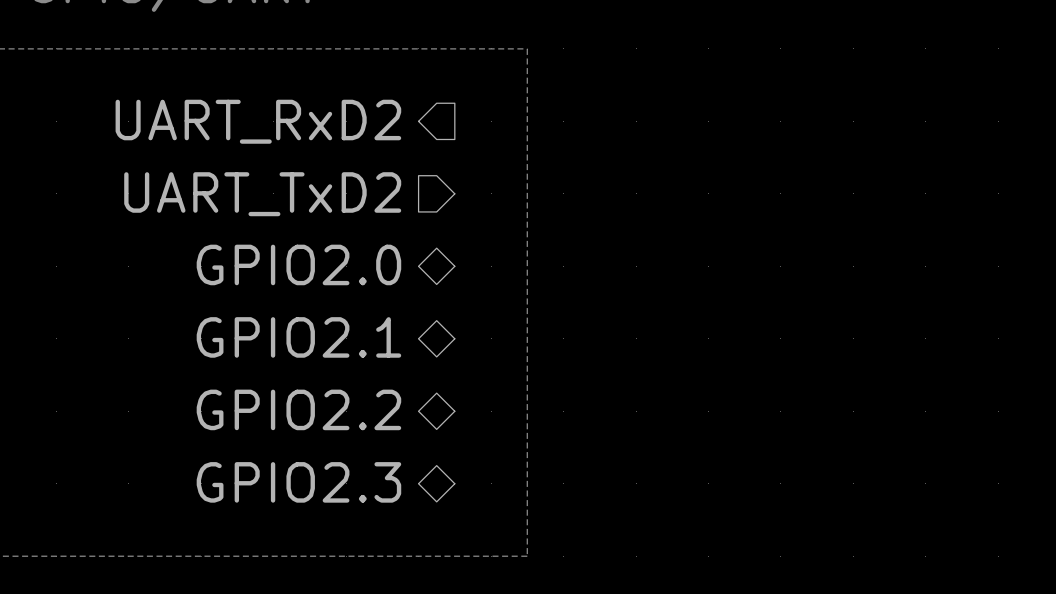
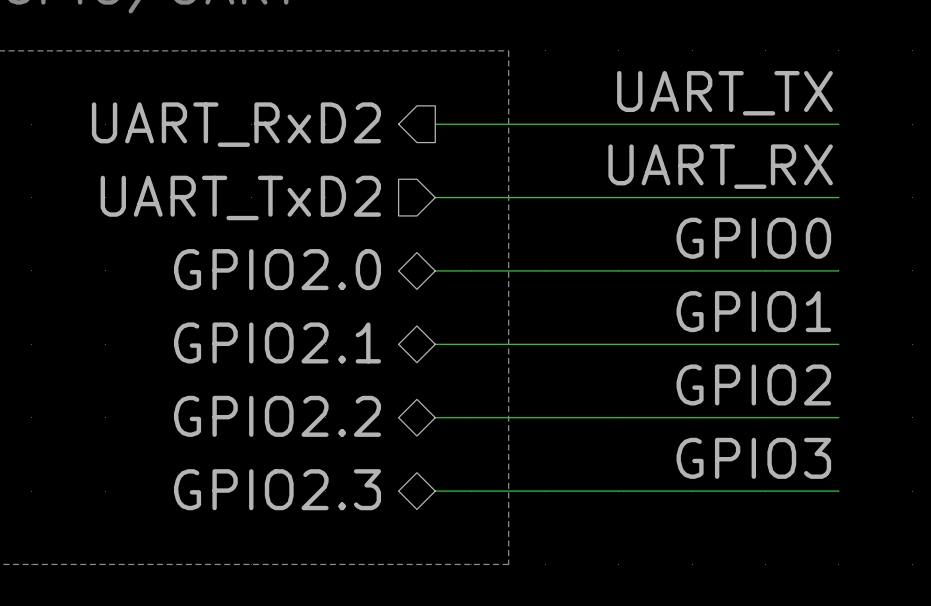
label: none -> UART_TX (725, 93)
wire: none -> (435, 124) (838, 124)
label: none -> UART_RX (720, 166)
wire: none -> (435, 197) (838, 197)
label: none -> GPIO0 (753, 238)
wire: none -> (435, 270) (838, 270)
label: none -> GPIO1 (753, 311)
wire: none -> (435, 344) (838, 344)
label: none -> GPIO2 (753, 384)
wire: none -> (435, 417) (838, 417)
label: none -> GPIO3 (753, 458)
wire: none -> (435, 491) (838, 491)

